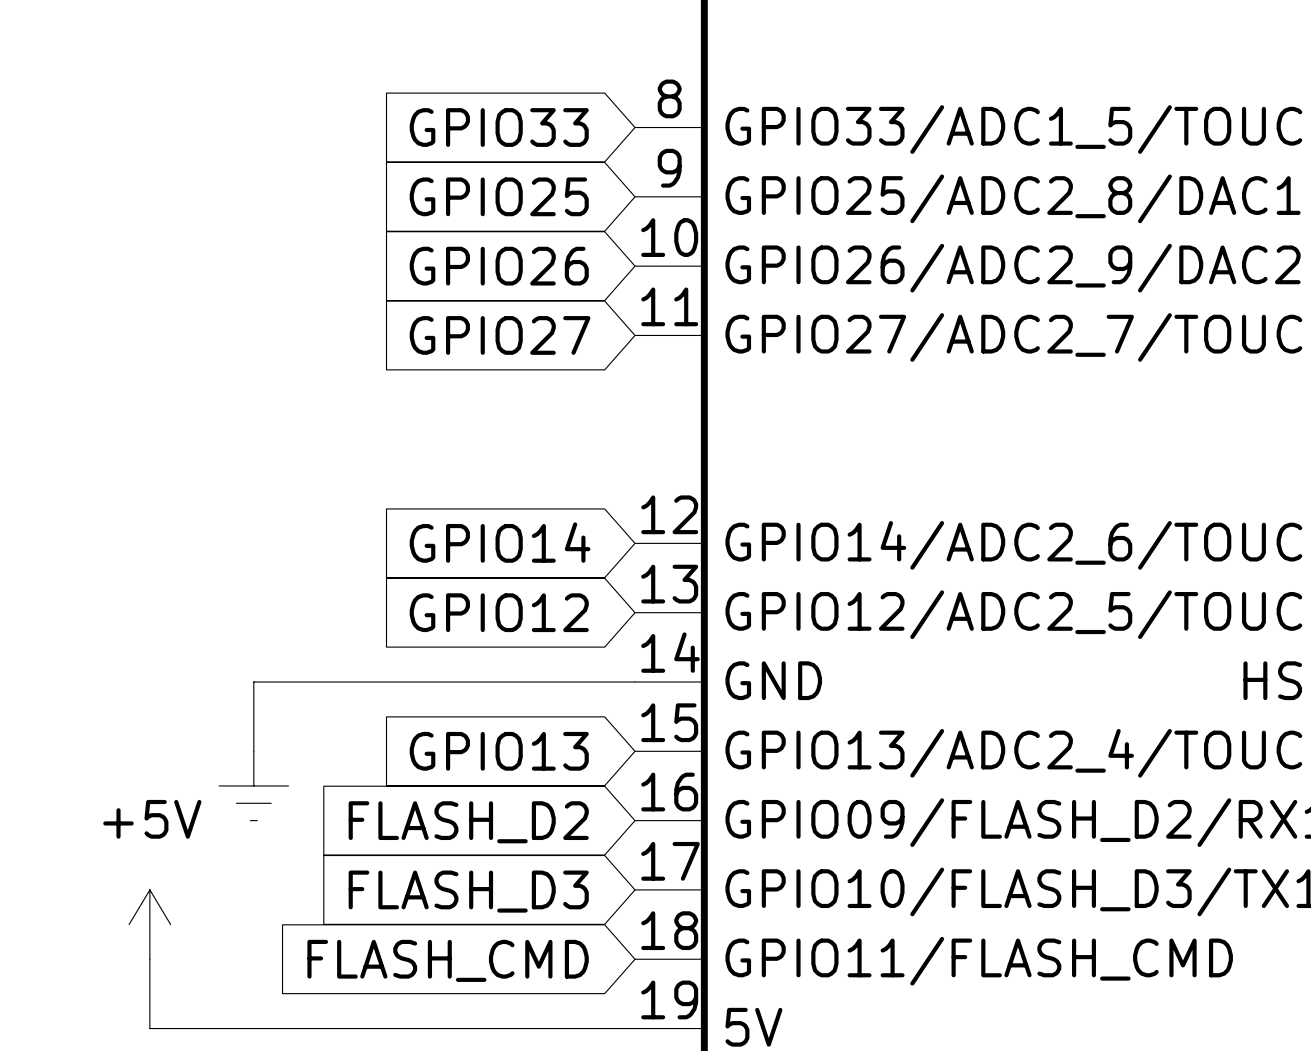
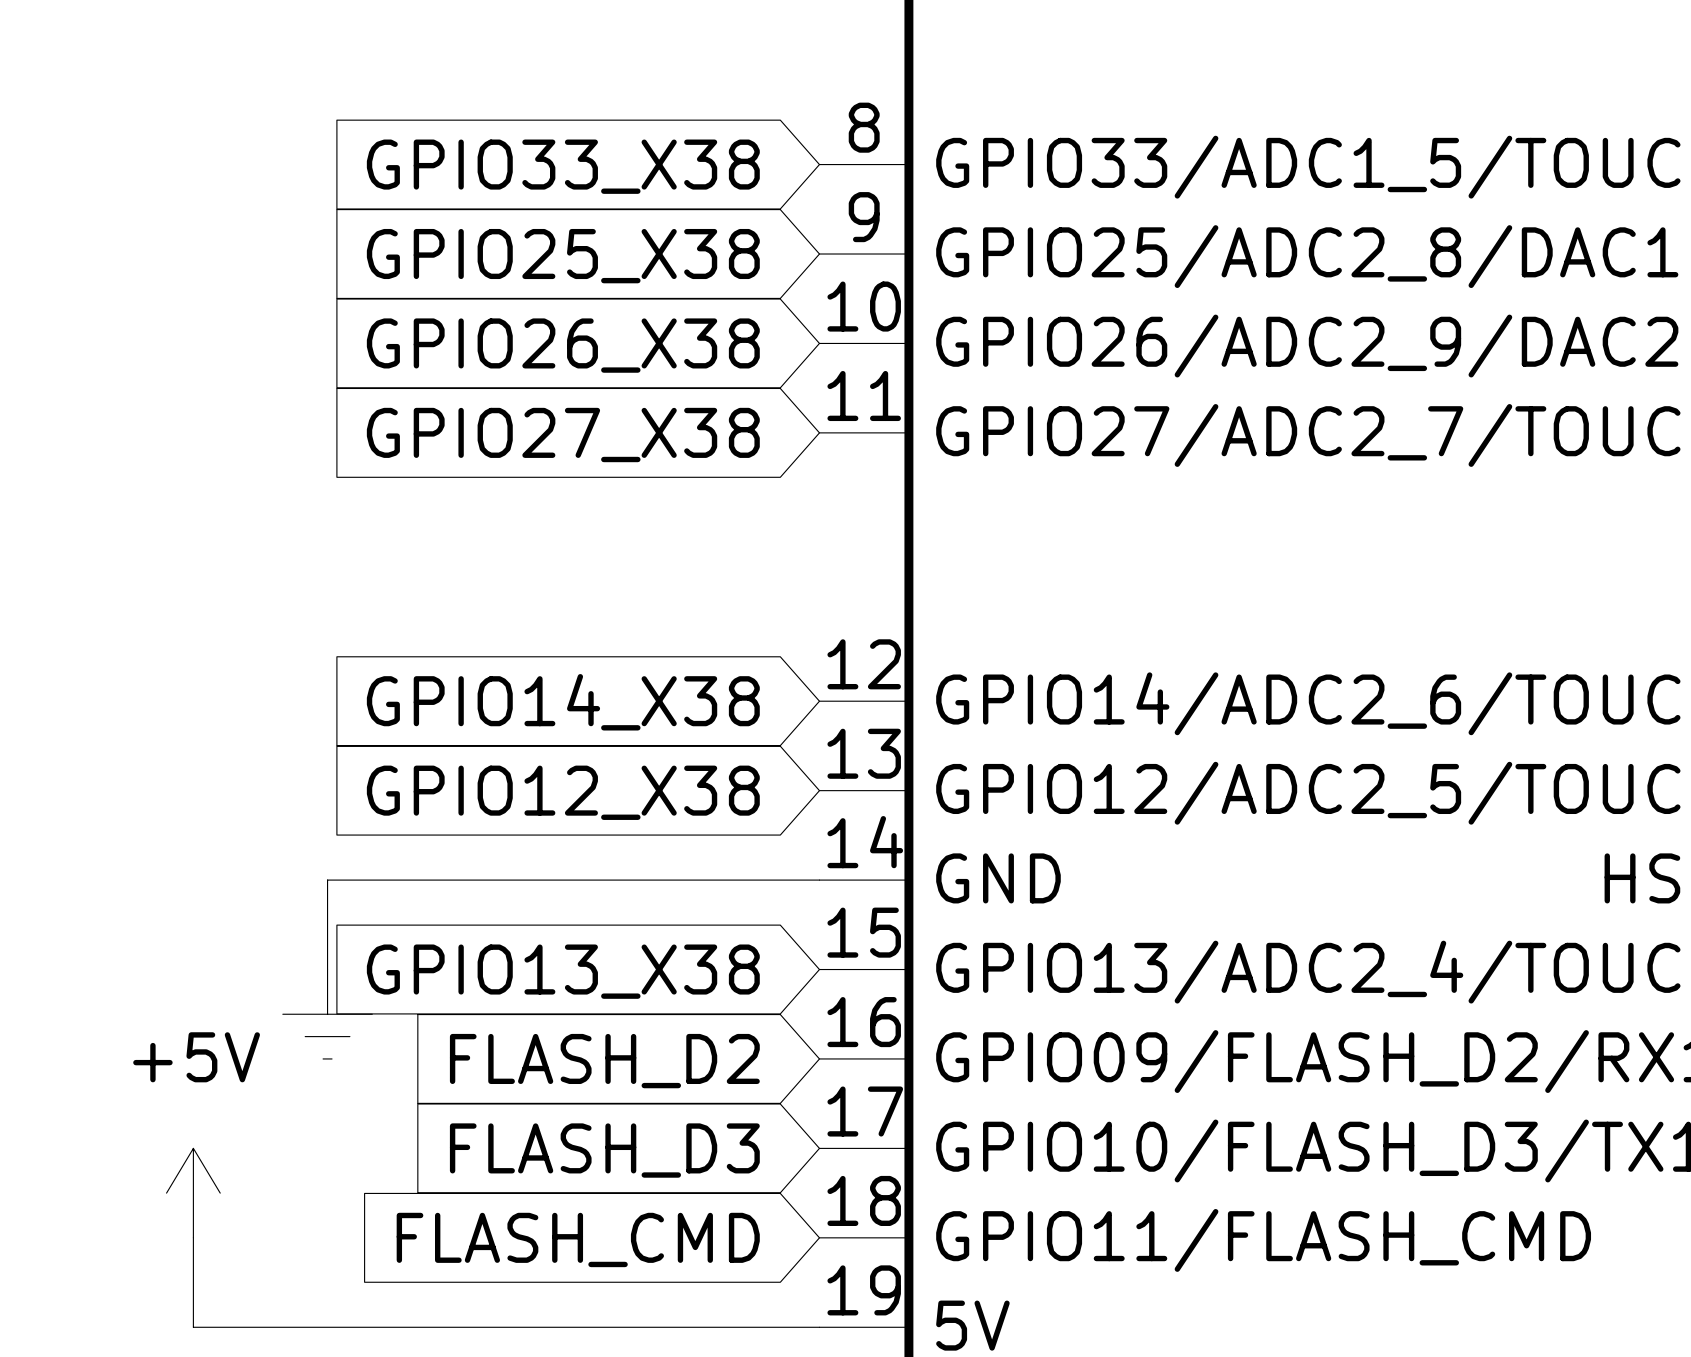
global label: GPIO33 (499, 127) -> GPIO33_X38 (563, 166)
global label: GPIO25 (499, 196) -> GPIO25_X38 (563, 256)
global label: GPIO26 (499, 266) -> GPIO26_X38 (563, 345)
global label: GPIO27 (500, 335) -> GPIO27_X38 (563, 435)
global label: GPIO14 (500, 542) -> GPIO14_X38 (563, 702)
global label: GPIO12 (499, 612) -> GPIO12_X38 (563, 792)
global label: GPIO13 (499, 751) -> GPIO13_X38 (563, 971)

